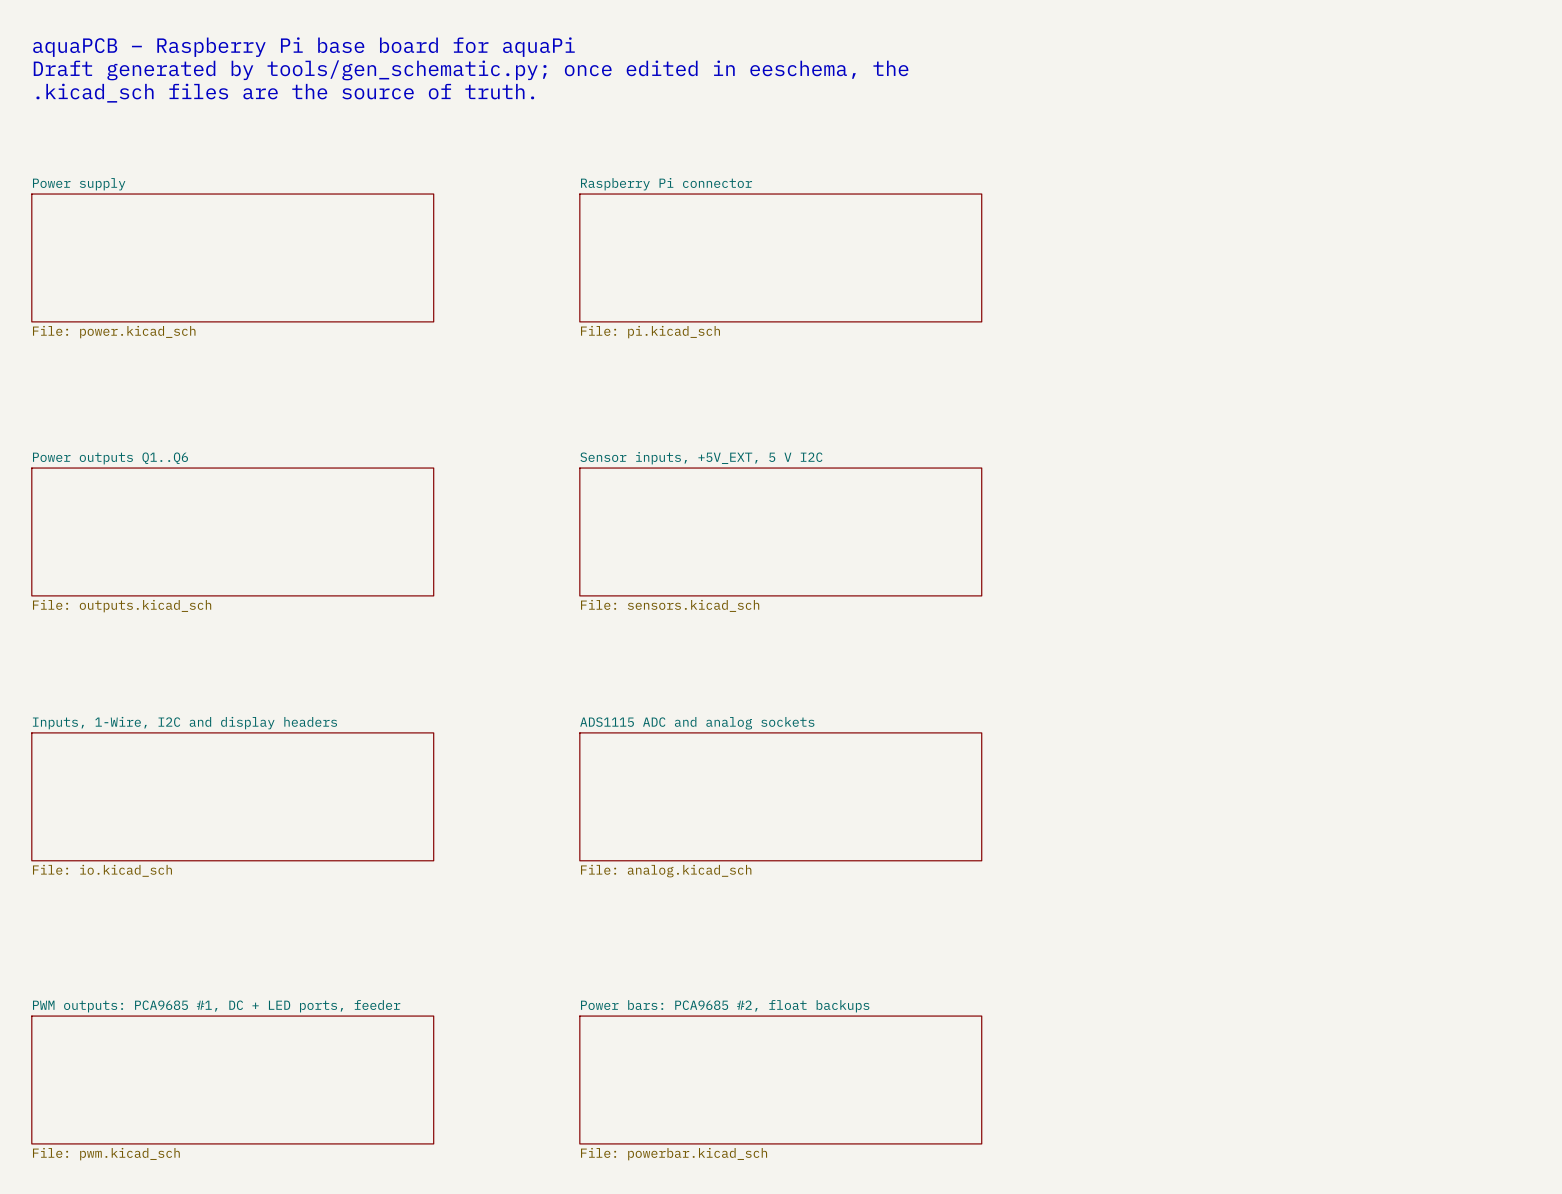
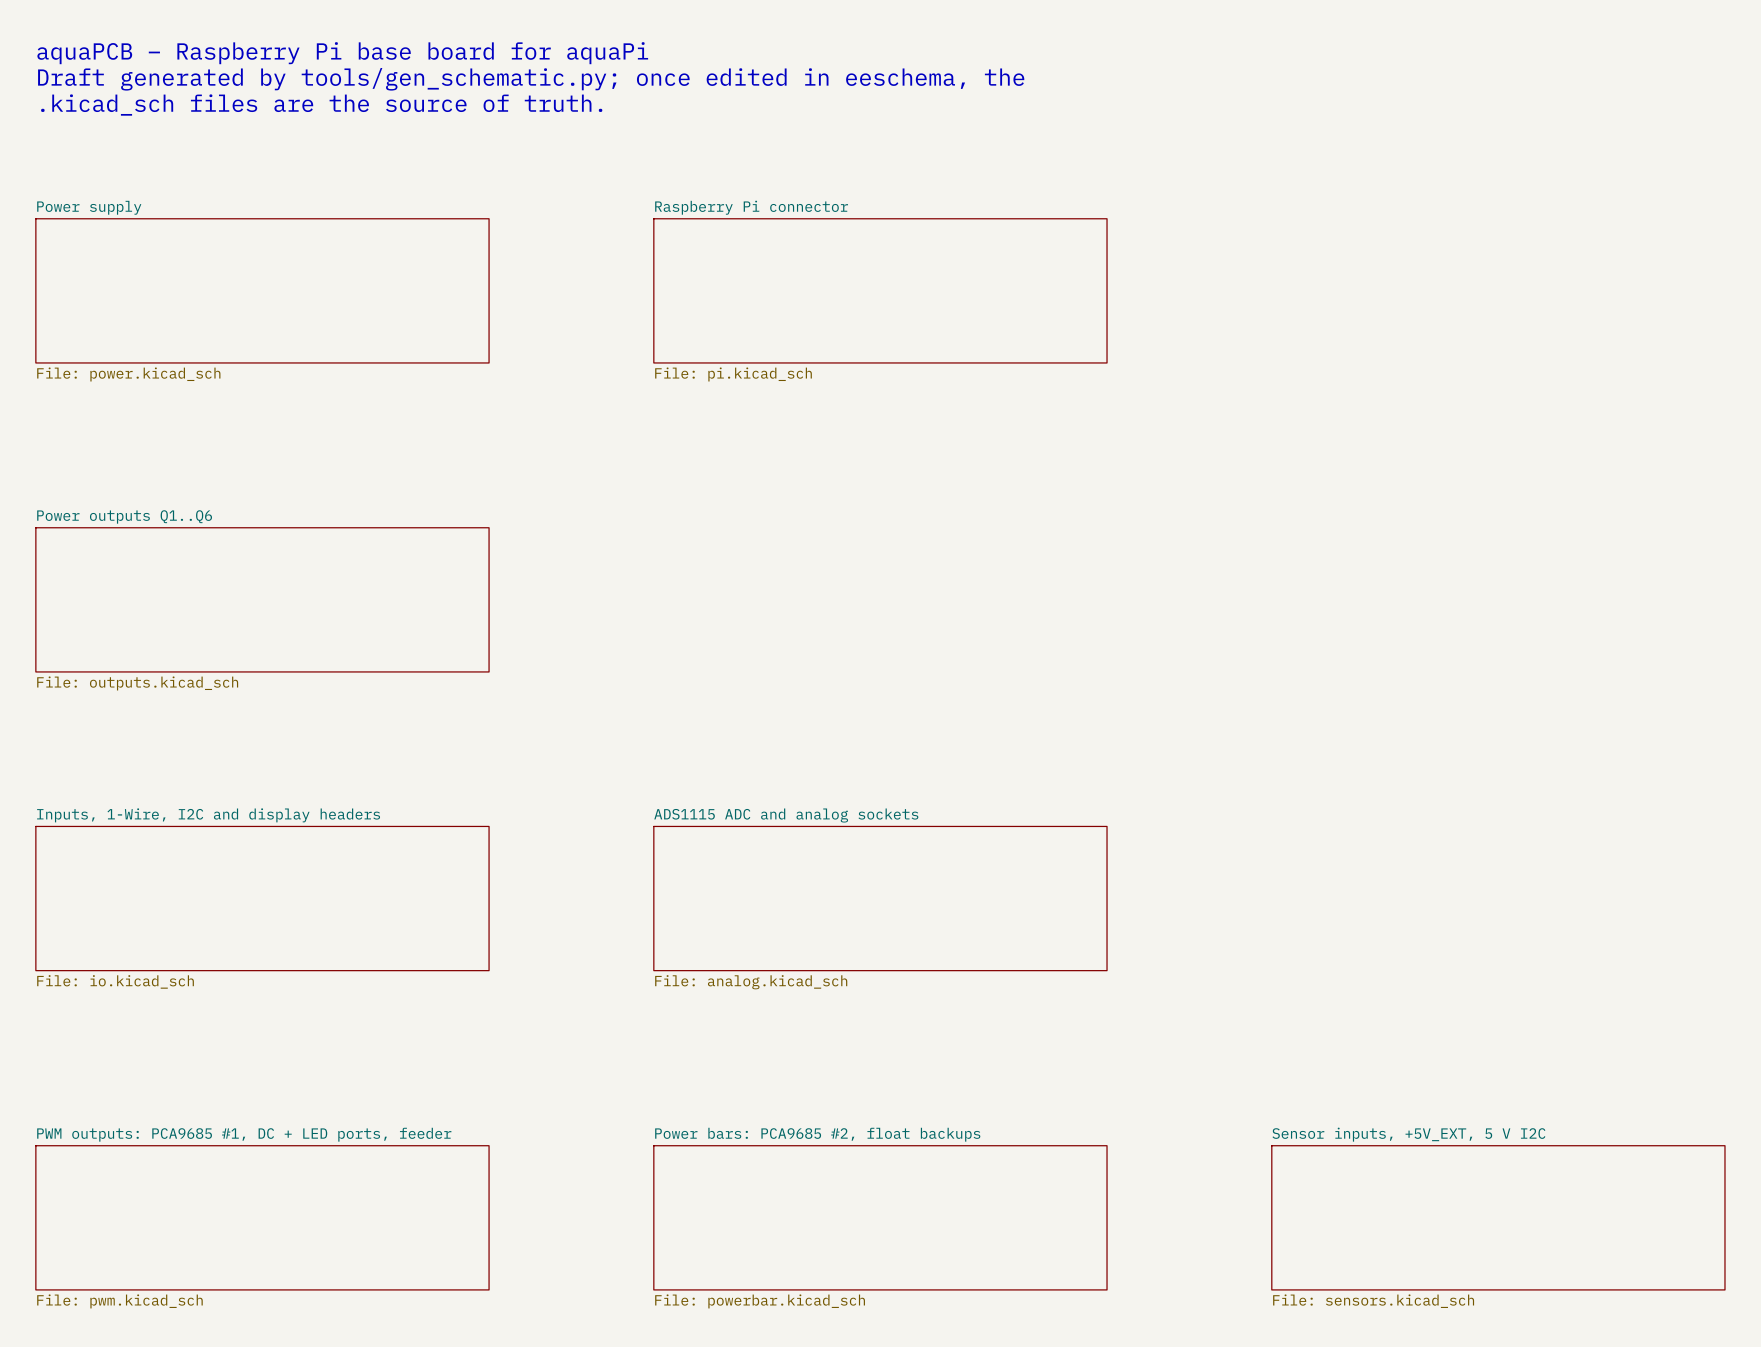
sheet Sensor inputs, +5V_EXT, 5 V I2C position: (780, 531) -> (1498, 1217)

